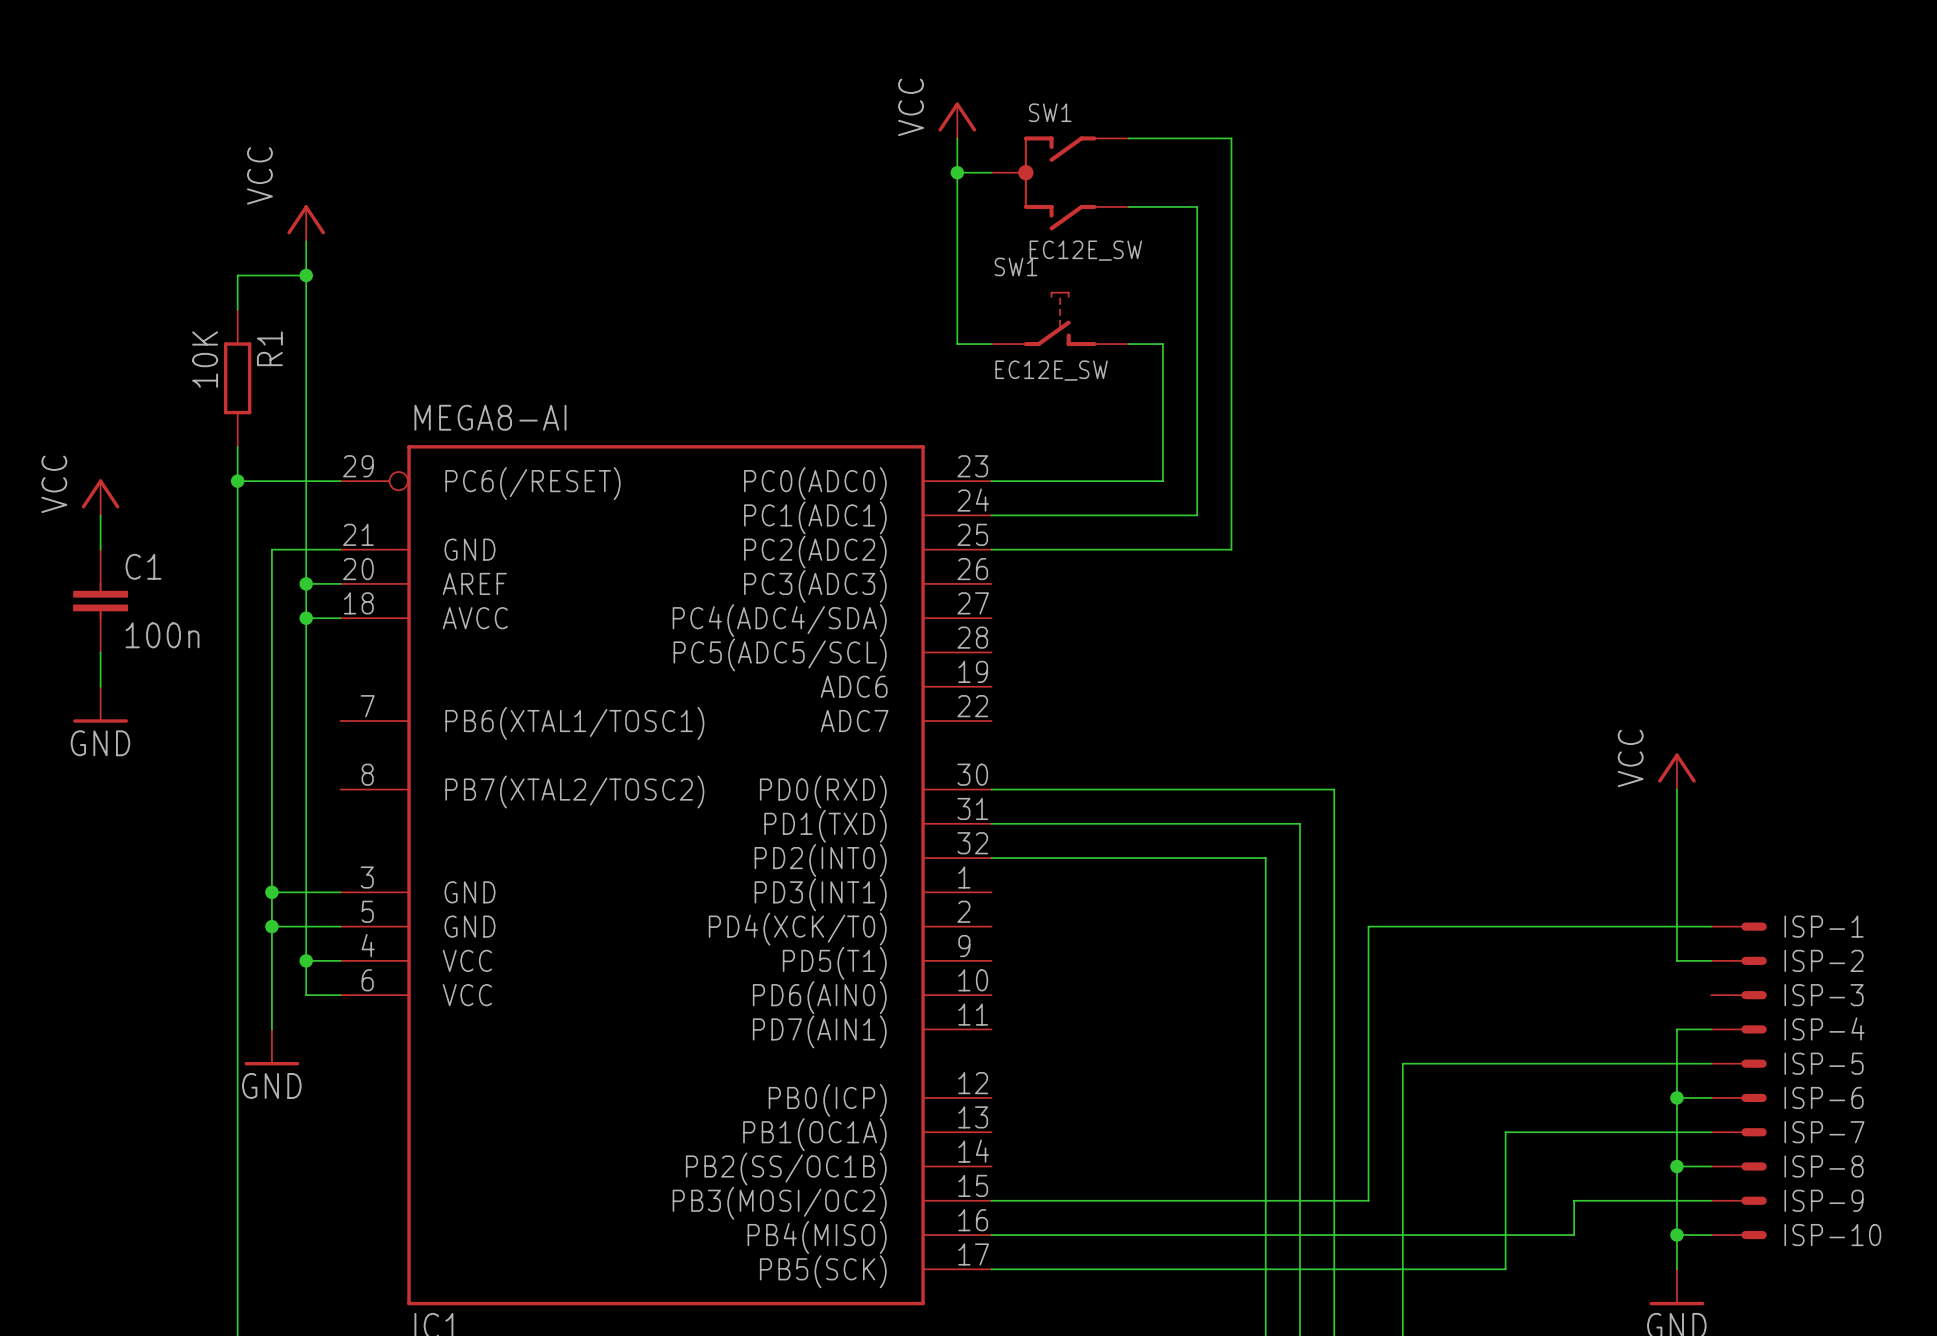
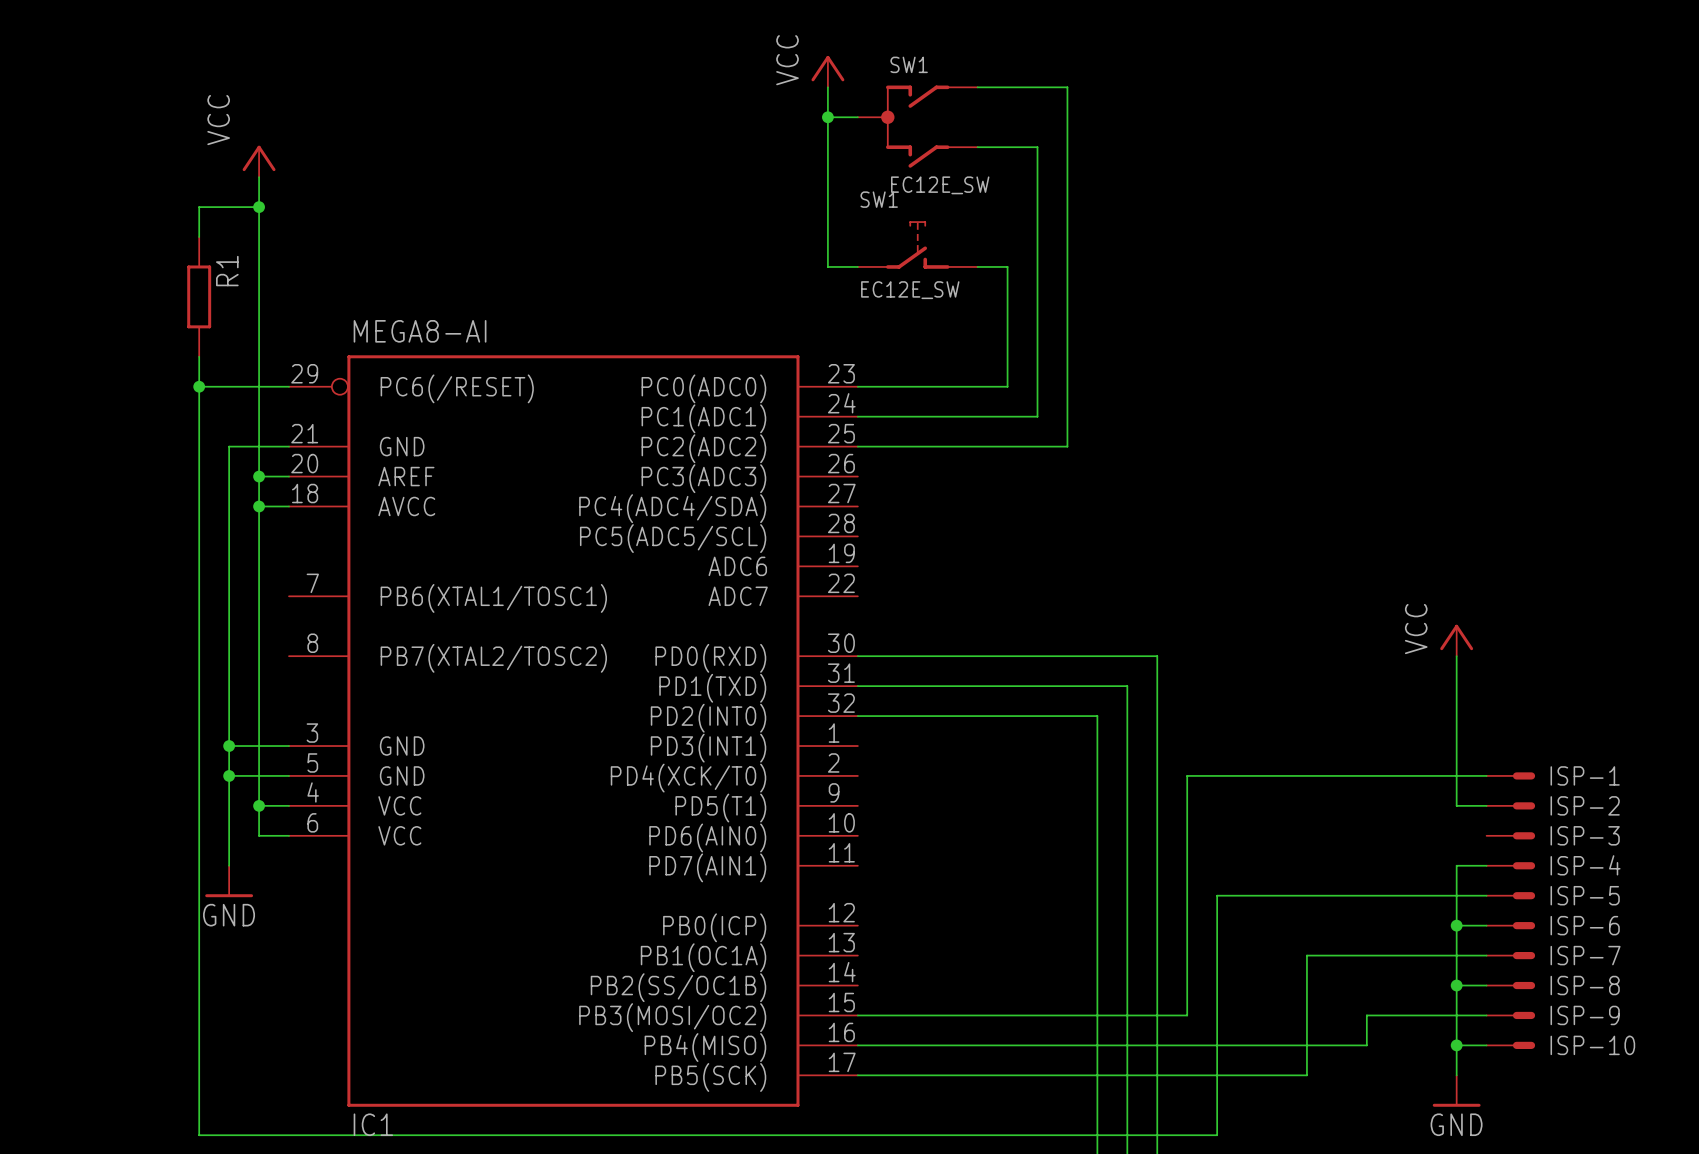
R1 value: 10K (205, 359) -> none
power symbol: VCC (100, 497) -> none
wire: (100, 515) (100, 549) -> none
C1: 100n (100, 601) -> none
wire: (100, 652) (100, 686) -> none
power symbol: GND (100, 704) -> none

